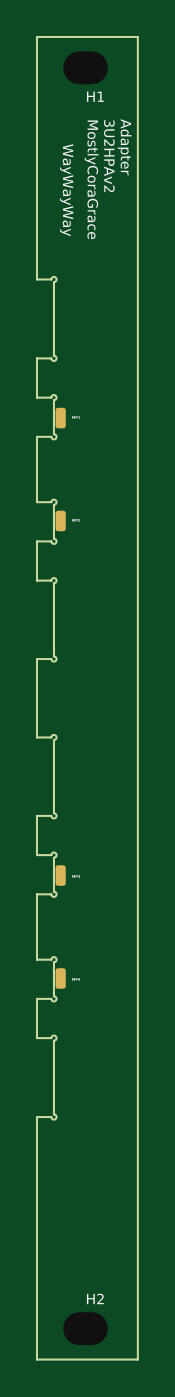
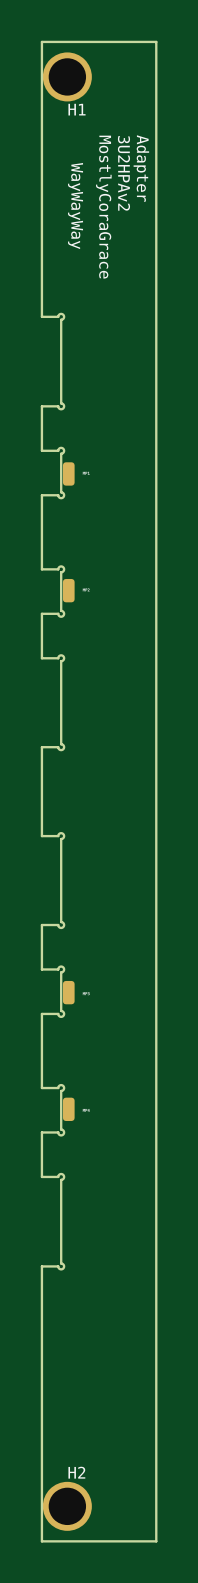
H1 footprint: [63, 51, 108, 85] -> [42, 52, 92, 102]
H2 footprint: [63, 1312, 108, 1346] -> [42, 1481, 92, 1531]

